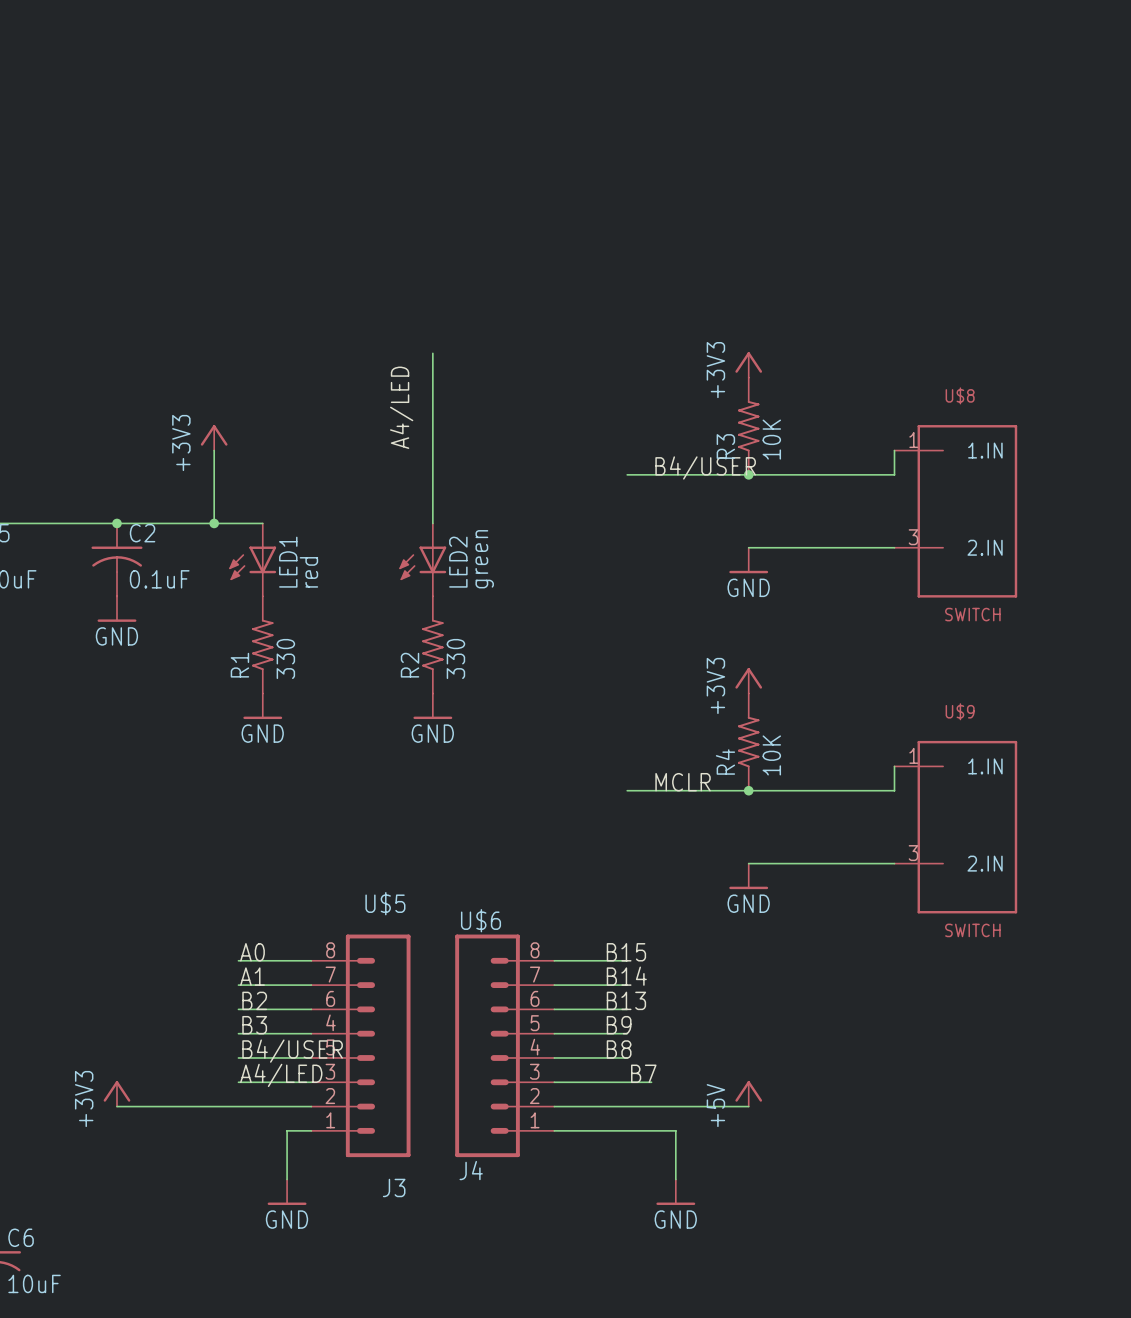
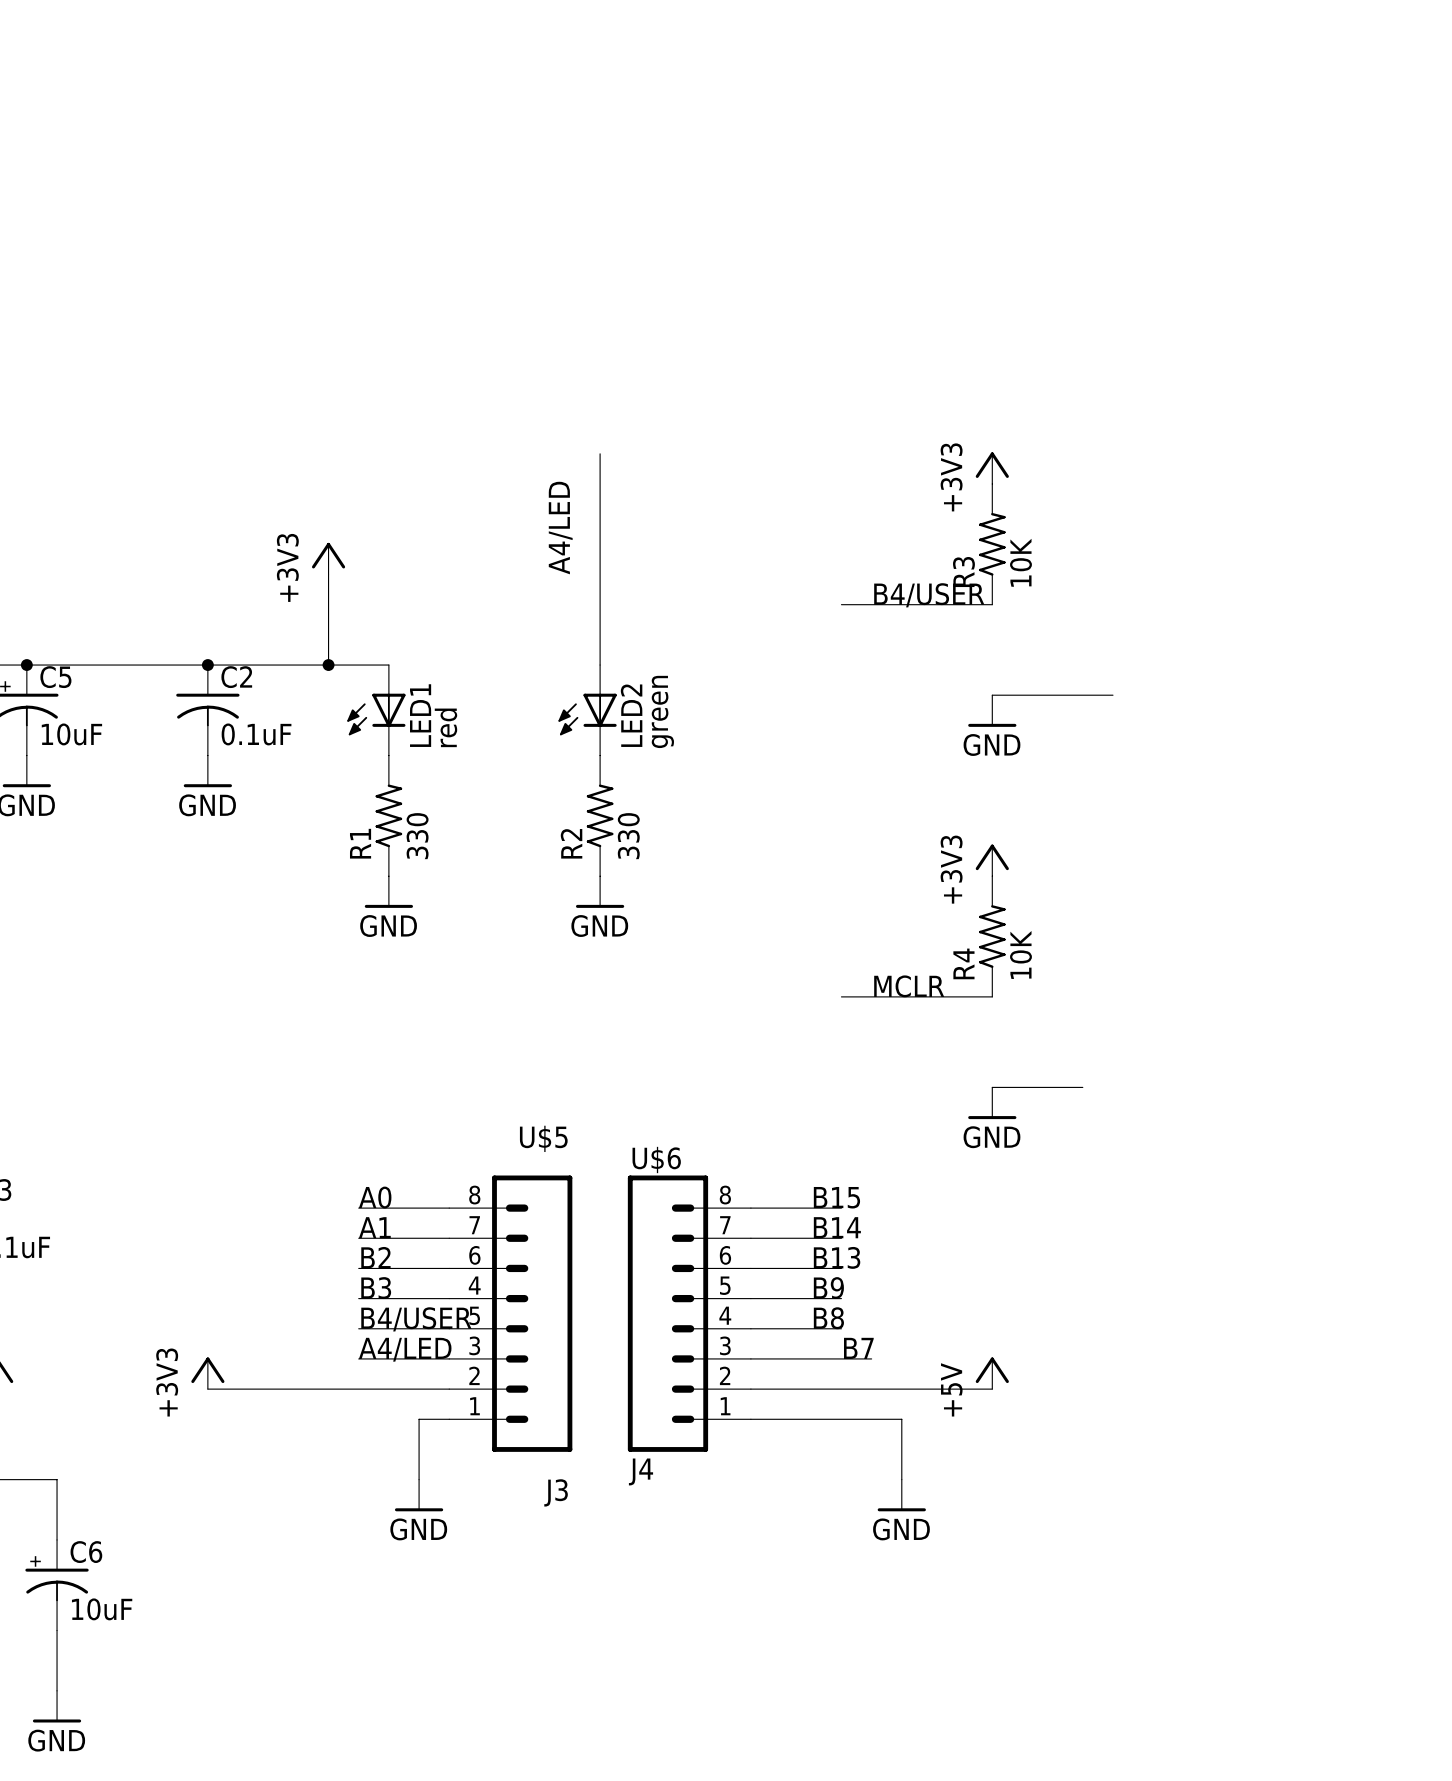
wire: (894, 450) (894, 474) (748, 474) -> none
junction: (748, 474) -> none
U$8: SWITCH (955, 511) -> none
wire: (845, 547) (894, 547) -> none
wire: (894, 766) (894, 790) (748, 790) -> none
junction: (748, 790) -> none
U$9: SWITCH (955, 827) -> none
wire: (821, 863) (894, 863) -> none

